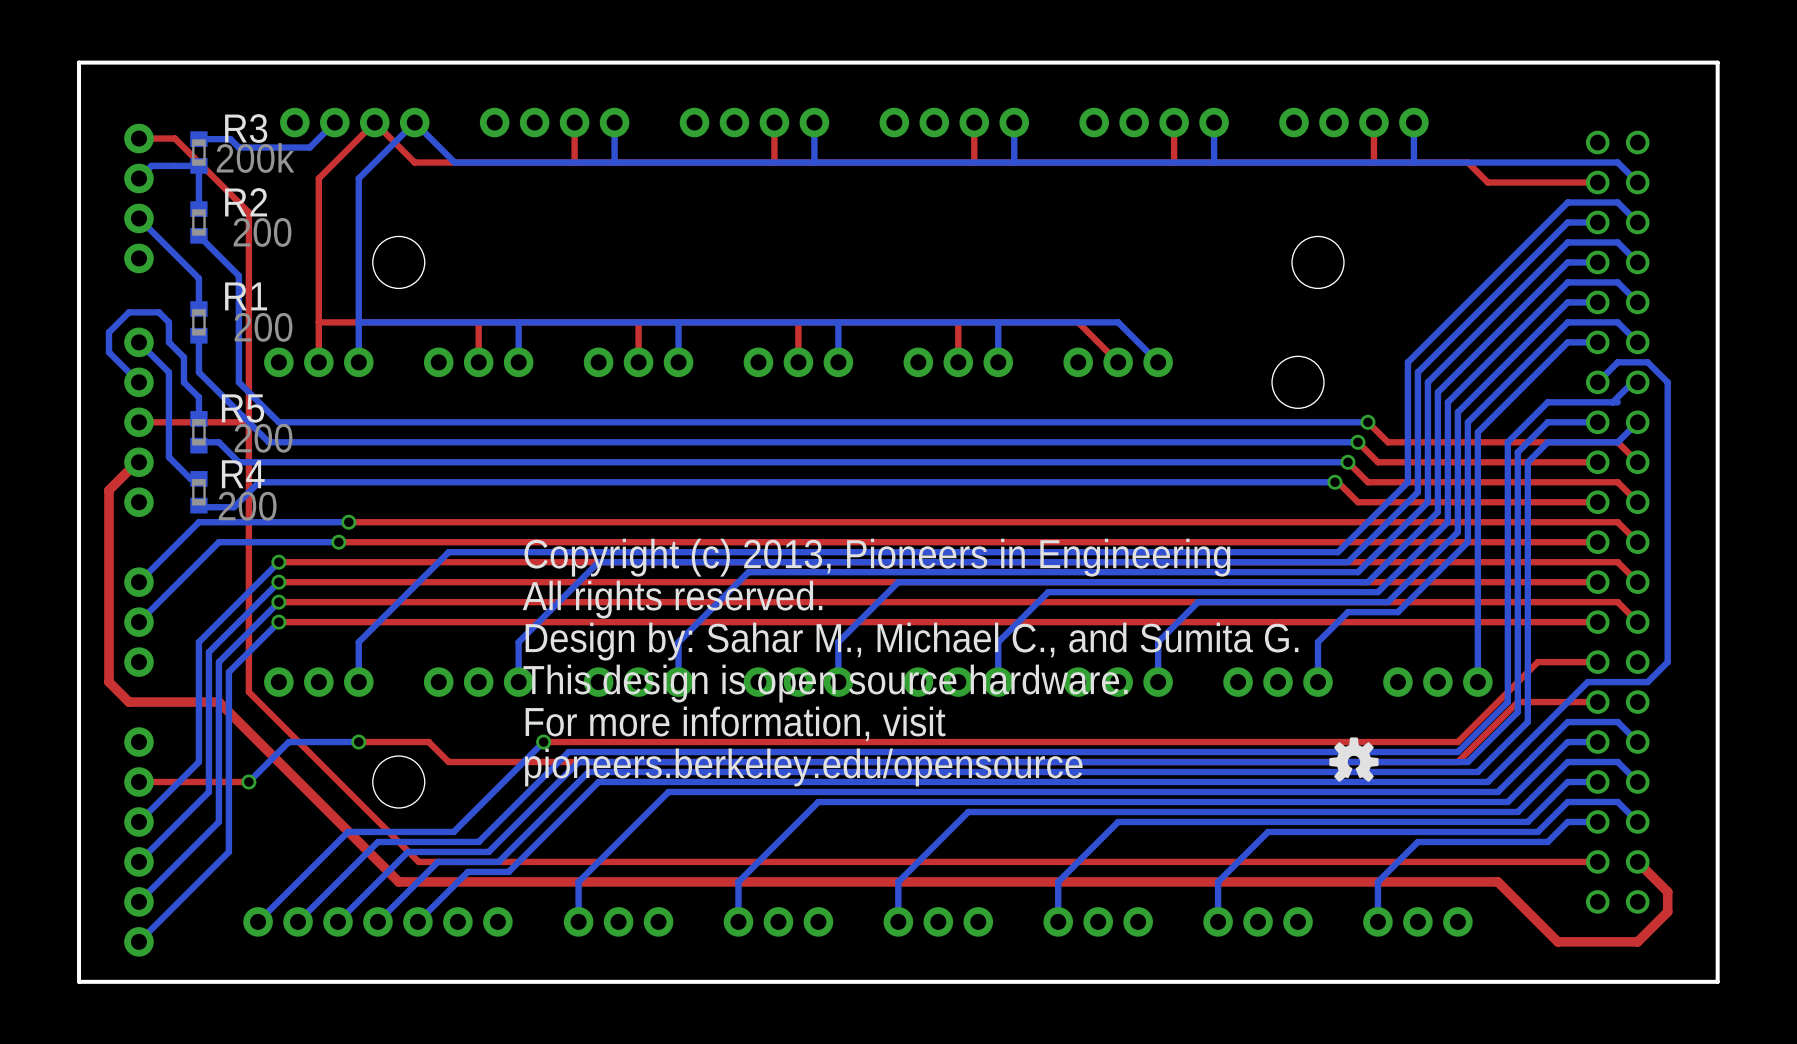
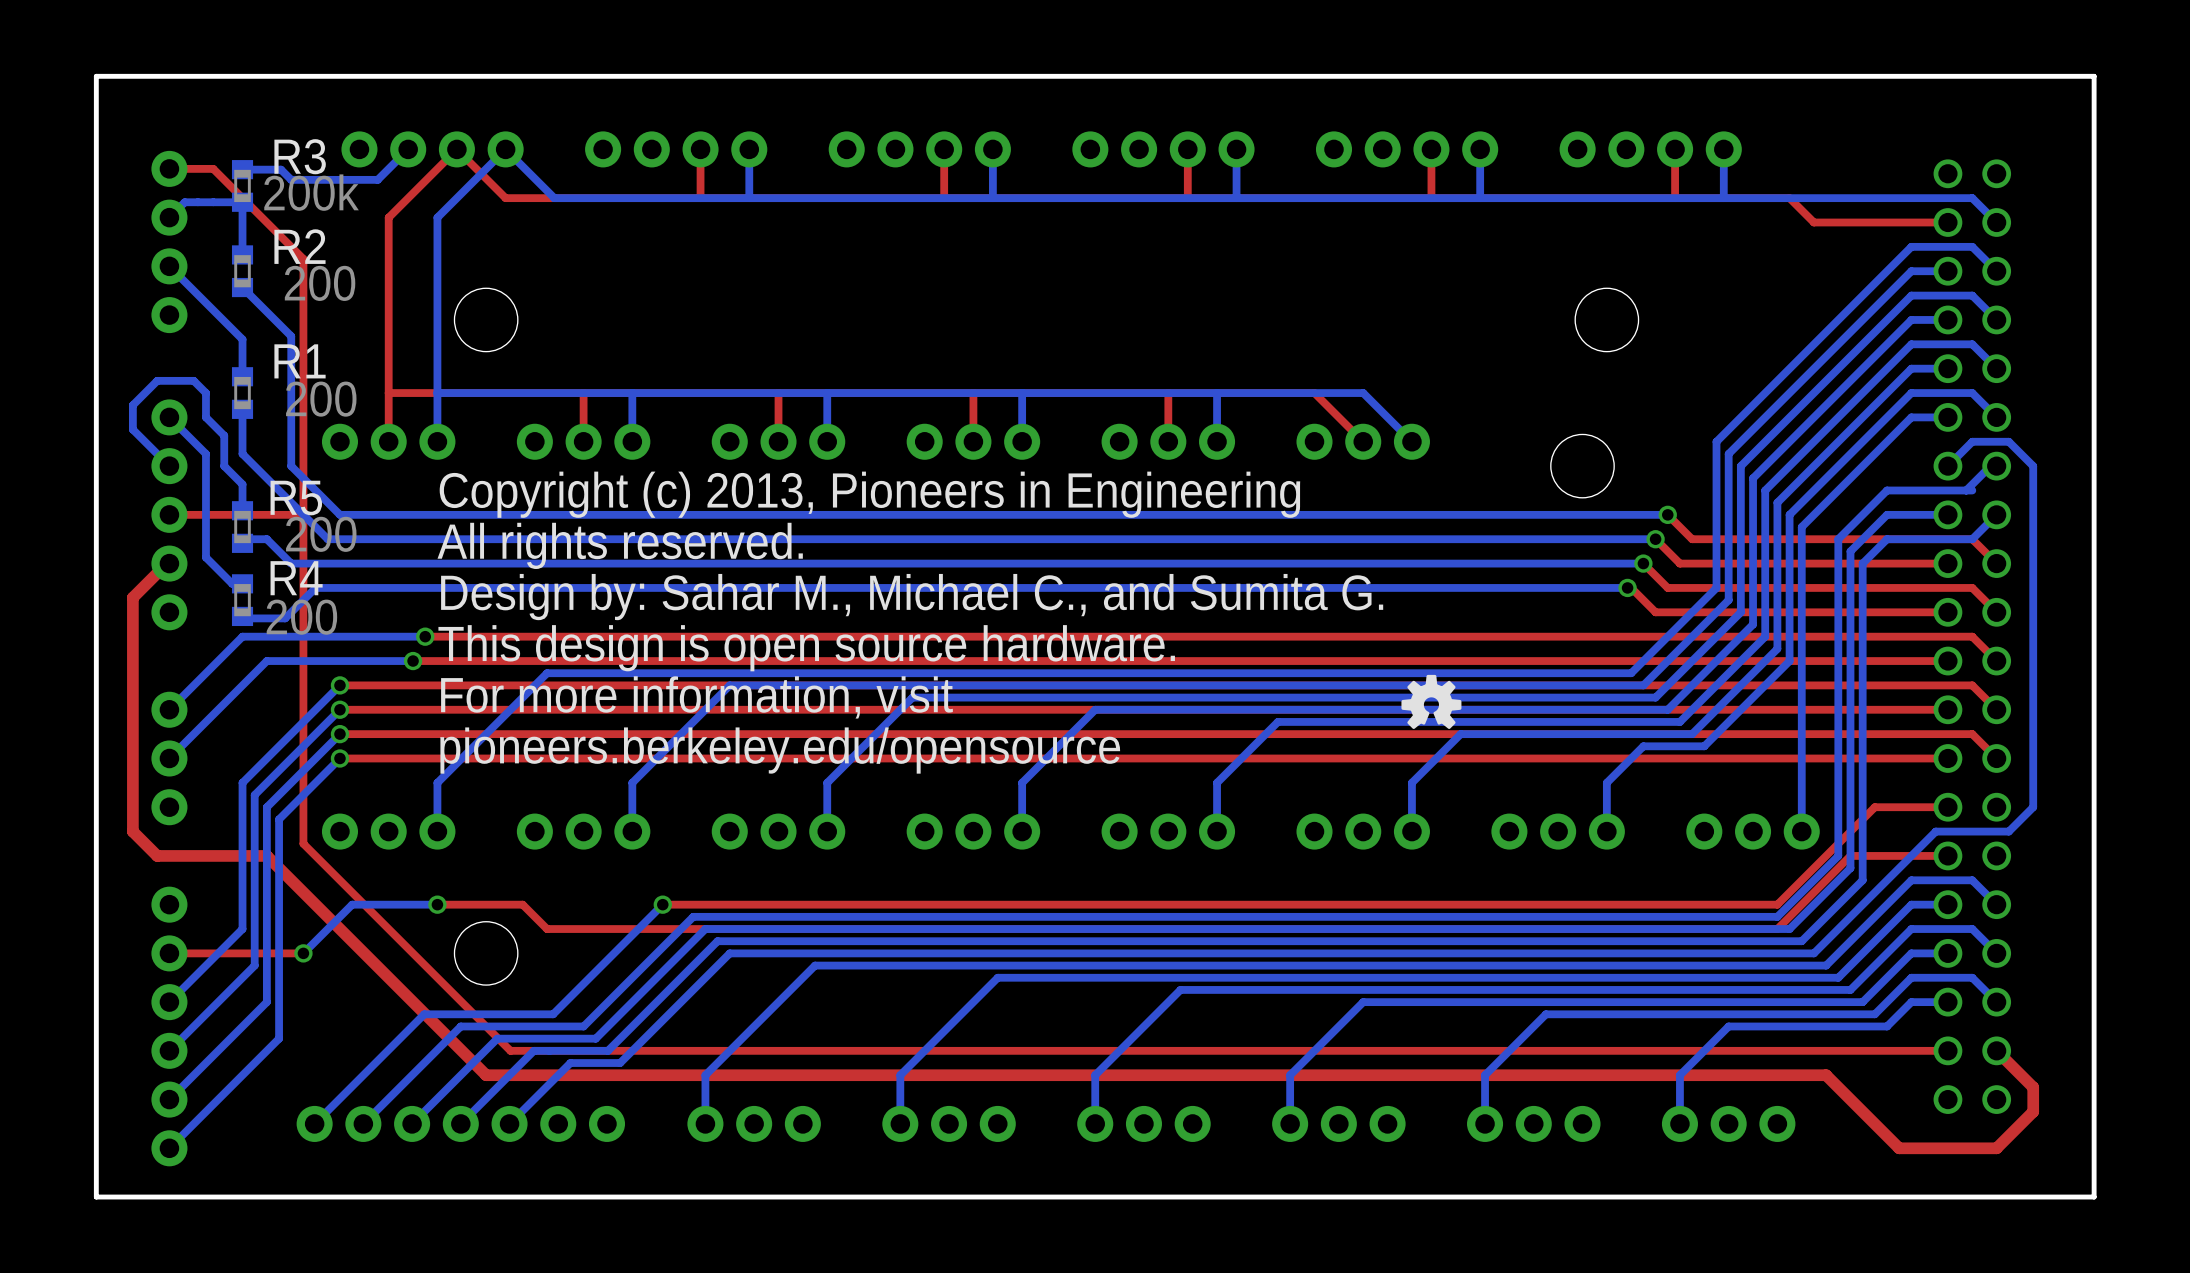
text position: Copyright (c) 2013, Pioneers in Engineering (877, 557) -> Copyright (c) 2013, Pioneers in Engineering (869, 494)
text position: All rights reserved. (672, 599) -> All rights reserved. (620, 545)
text position: Design by: Sahar M., Michael C., and Sumita G. (912, 641) -> Design by: Sahar M., Michael C., and Sumita G. (912, 597)
text position: This design is open source hardware. (825, 683) -> This design is open source hardware. (806, 648)
text position: For more information, visit (735, 723) -> For more information, visit (696, 697)
drawing position: (1353, 759) -> (1431, 701)
text position: pioneers.berkeley.edu/opensource (803, 767) -> pioneers.berkeley.edu/opensource (780, 750)

